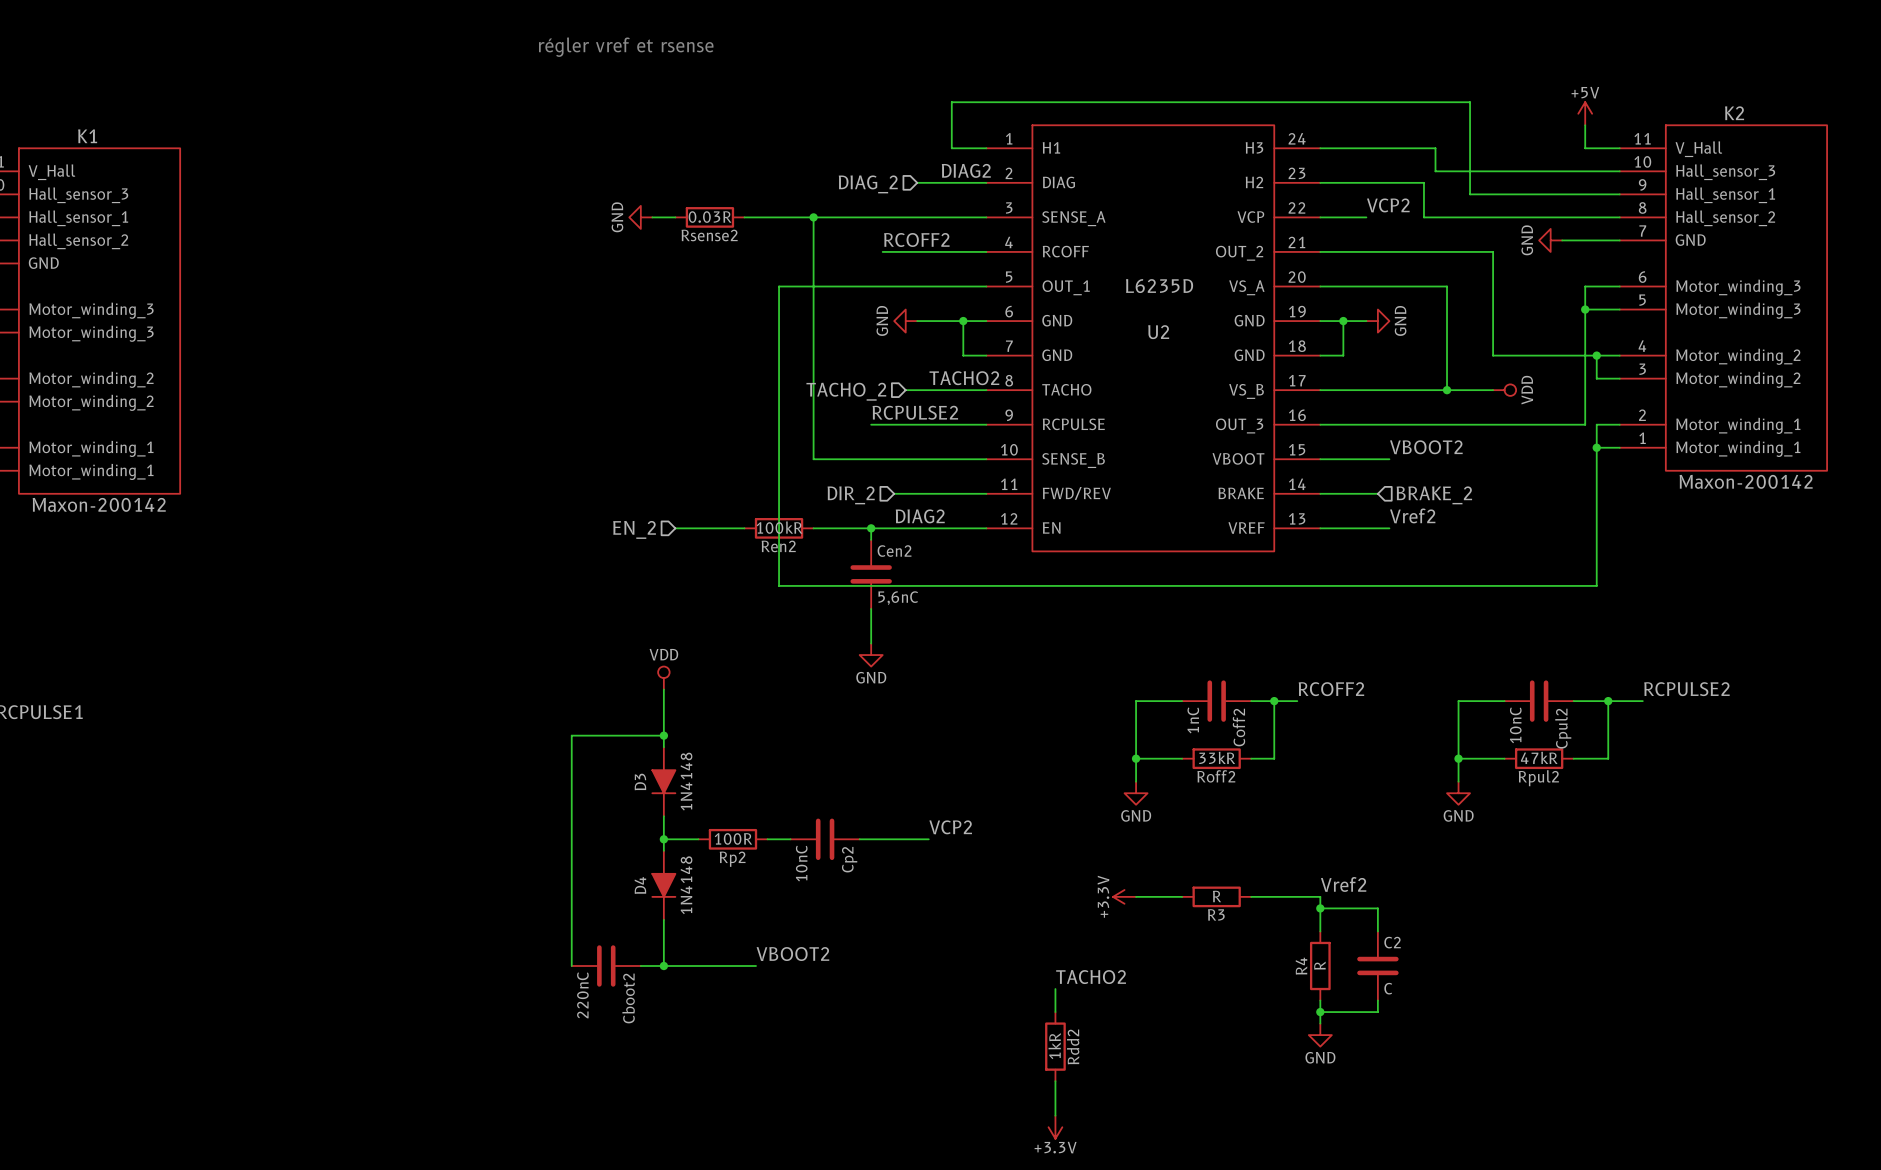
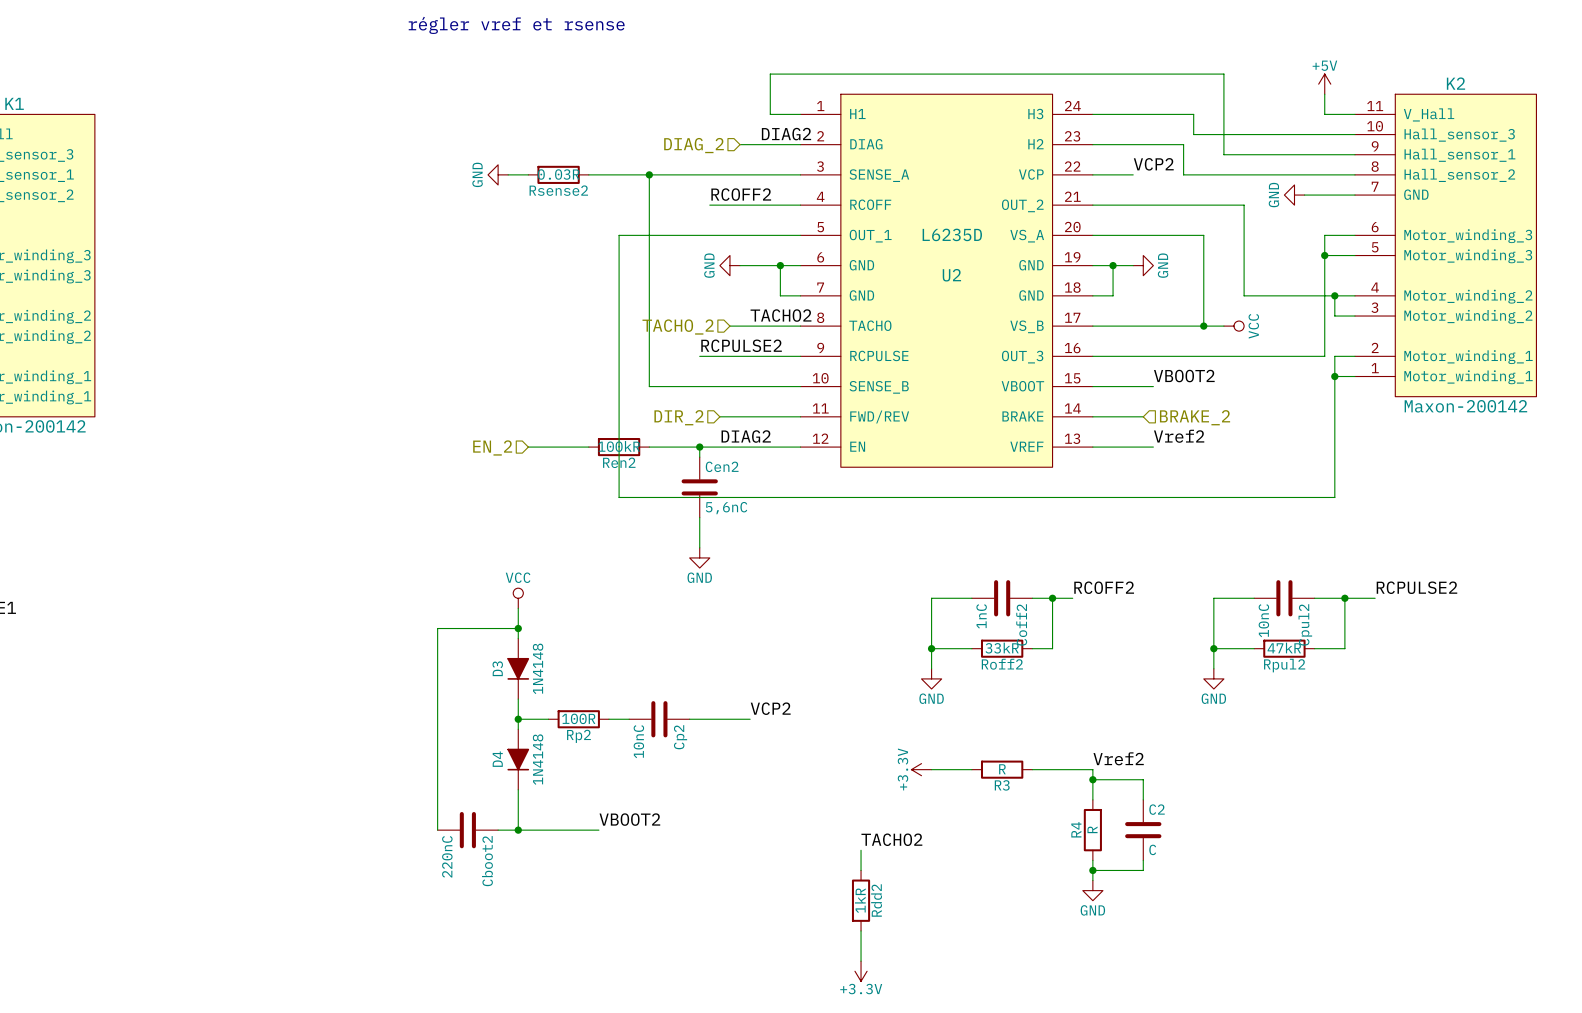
power symbol: none -> VCC (1234, 326)
power symbol: VDD (1504, 390) -> none
power symbol: VDD (663, 678) -> none
power symbol: none -> VCC (518, 598)

